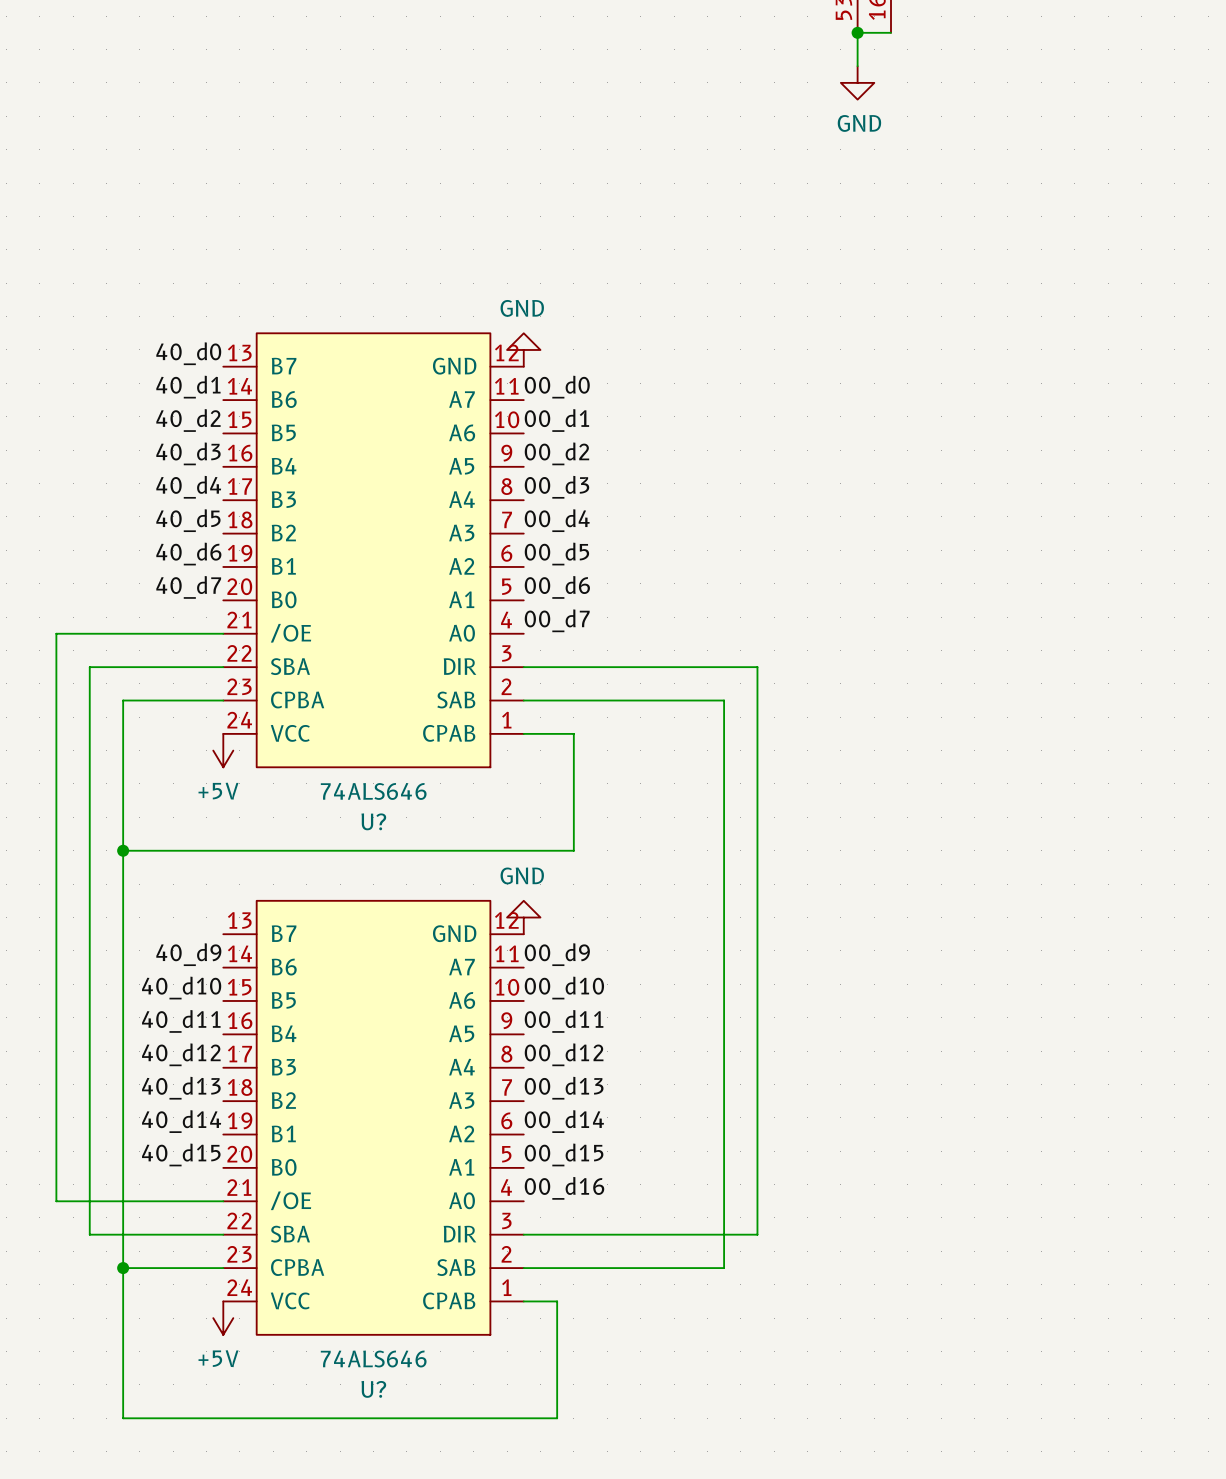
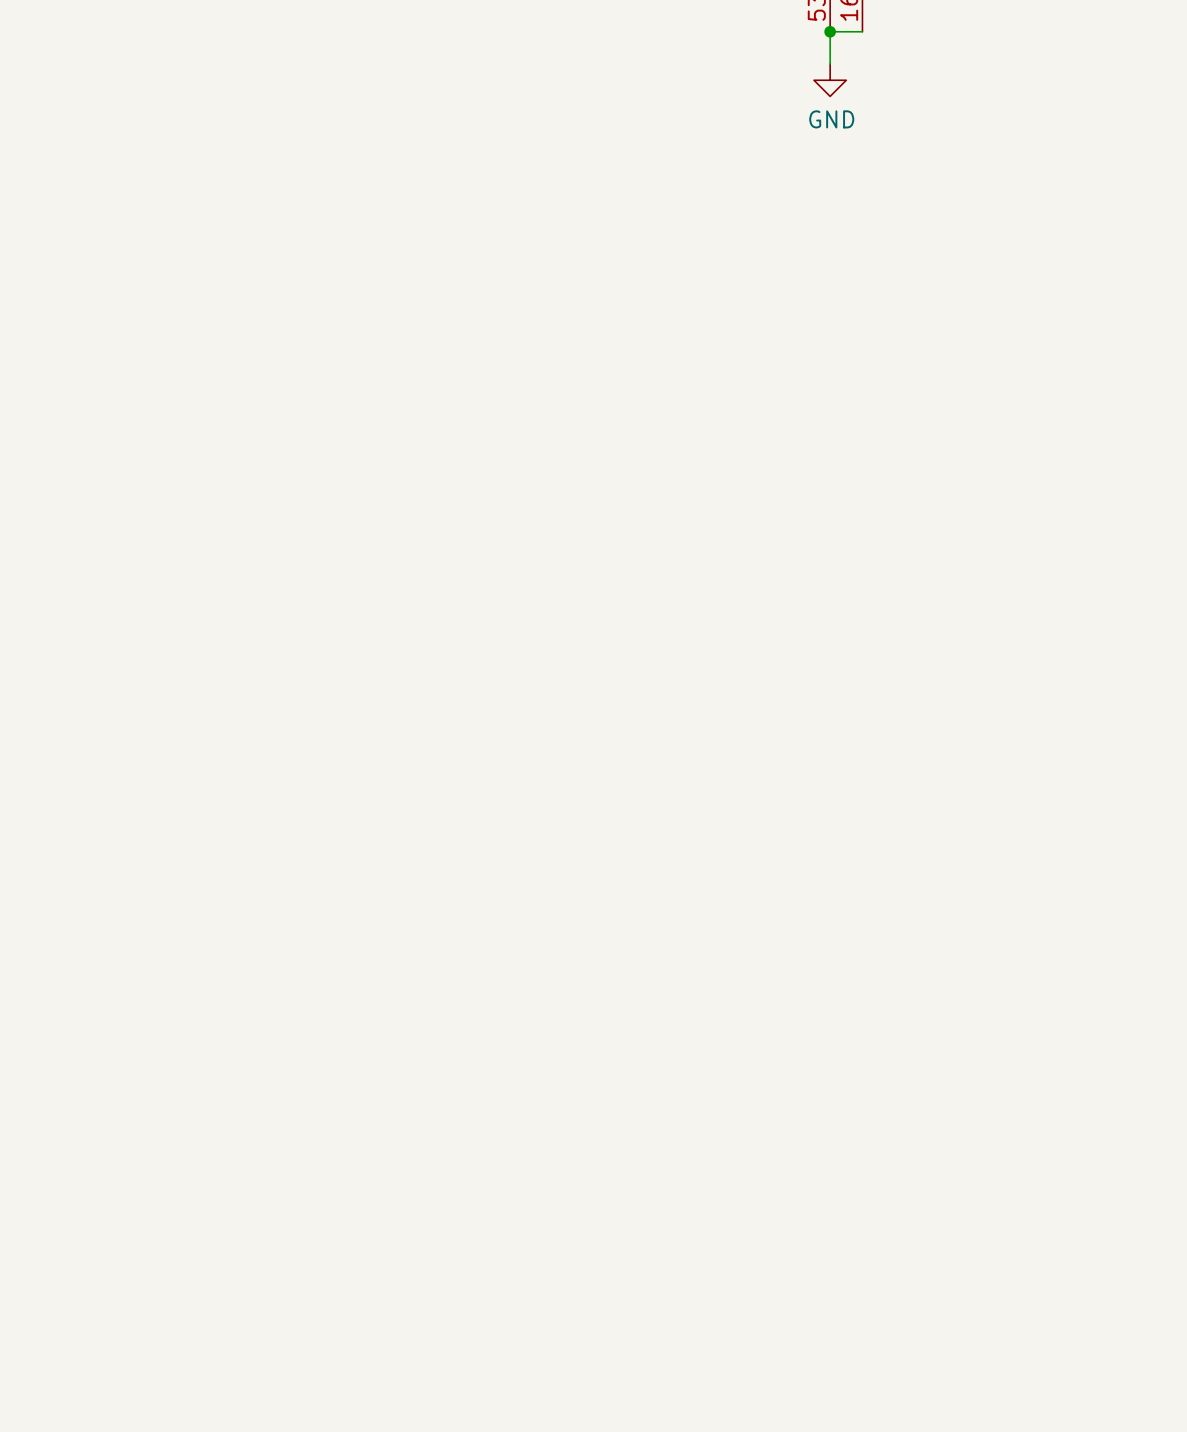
power symbol: GND (523, 349) -> none
label: 40_d0 (188, 353) -> none
label: 40_d1 (188, 387) -> none
label: 00_d0 (557, 387) -> none
label: 40_d2 (188, 420) -> none
label: 00_d1 (556, 420) -> none
label: 40_d3 (188, 453) -> none
label: 00_d2 (556, 453) -> none
label: 40_d4 (188, 487) -> none
label: 00_d3 (556, 487) -> none
label: 40_d5 (188, 520) -> none
label: 00_d4 (557, 520) -> none
U?: 74ALS646 (373, 550) -> none
label: 40_d6 (188, 554) -> none
label: 00_d5 (556, 554) -> none
label: 40_d7 (188, 587) -> none
label: 00_d6 (557, 587) -> none
label: 00_d7 (557, 620) -> none
wire: (223, 633) (56, 633) (56, 1201) (223, 1201) -> none
wire: (223, 667) (89, 667) (89, 1234) (223, 1234) -> none
wire: (523, 667) (757, 667) (757, 1234) (523, 1234) -> none
wire: (223, 700) (123, 700) (123, 1418) (557, 1418) (557, 1301) (523, 1301) -> none
wire: (523, 700) (724, 700) (724, 1268) (523, 1268) -> none
wire: (523, 733) (573, 733) (573, 850) (123, 850) -> none
power symbol: +5V (223, 750) -> none
junction: (123, 850) -> none
power symbol: GND (523, 917) -> none
label: 40_d9 (188, 954) -> none
label: 00_d9 (557, 954) -> none
label: 40_d10 (181, 988) -> none
label: 00_d10 (564, 988) -> none
label: 40_d11 (181, 1021) -> none
label: 00_d11 (564, 1021) -> none
label: 40_d12 (181, 1054) -> none
label: 00_d12 (564, 1054) -> none
label: 40_d13 (181, 1088) -> none
label: 00_d13 (564, 1088) -> none
U?: 74ALS646 (373, 1117) -> none
label: 40_d14 (181, 1121) -> none
label: 00_d14 (564, 1121) -> none
label: 40_d15 (181, 1154) -> none
label: 00_d15 (564, 1154) -> none
label: 00_d16 (564, 1188) -> none
wire: (123, 1268) (223, 1268) -> none
junction: (123, 1268) -> none
power symbol: +5V (223, 1318) -> none

